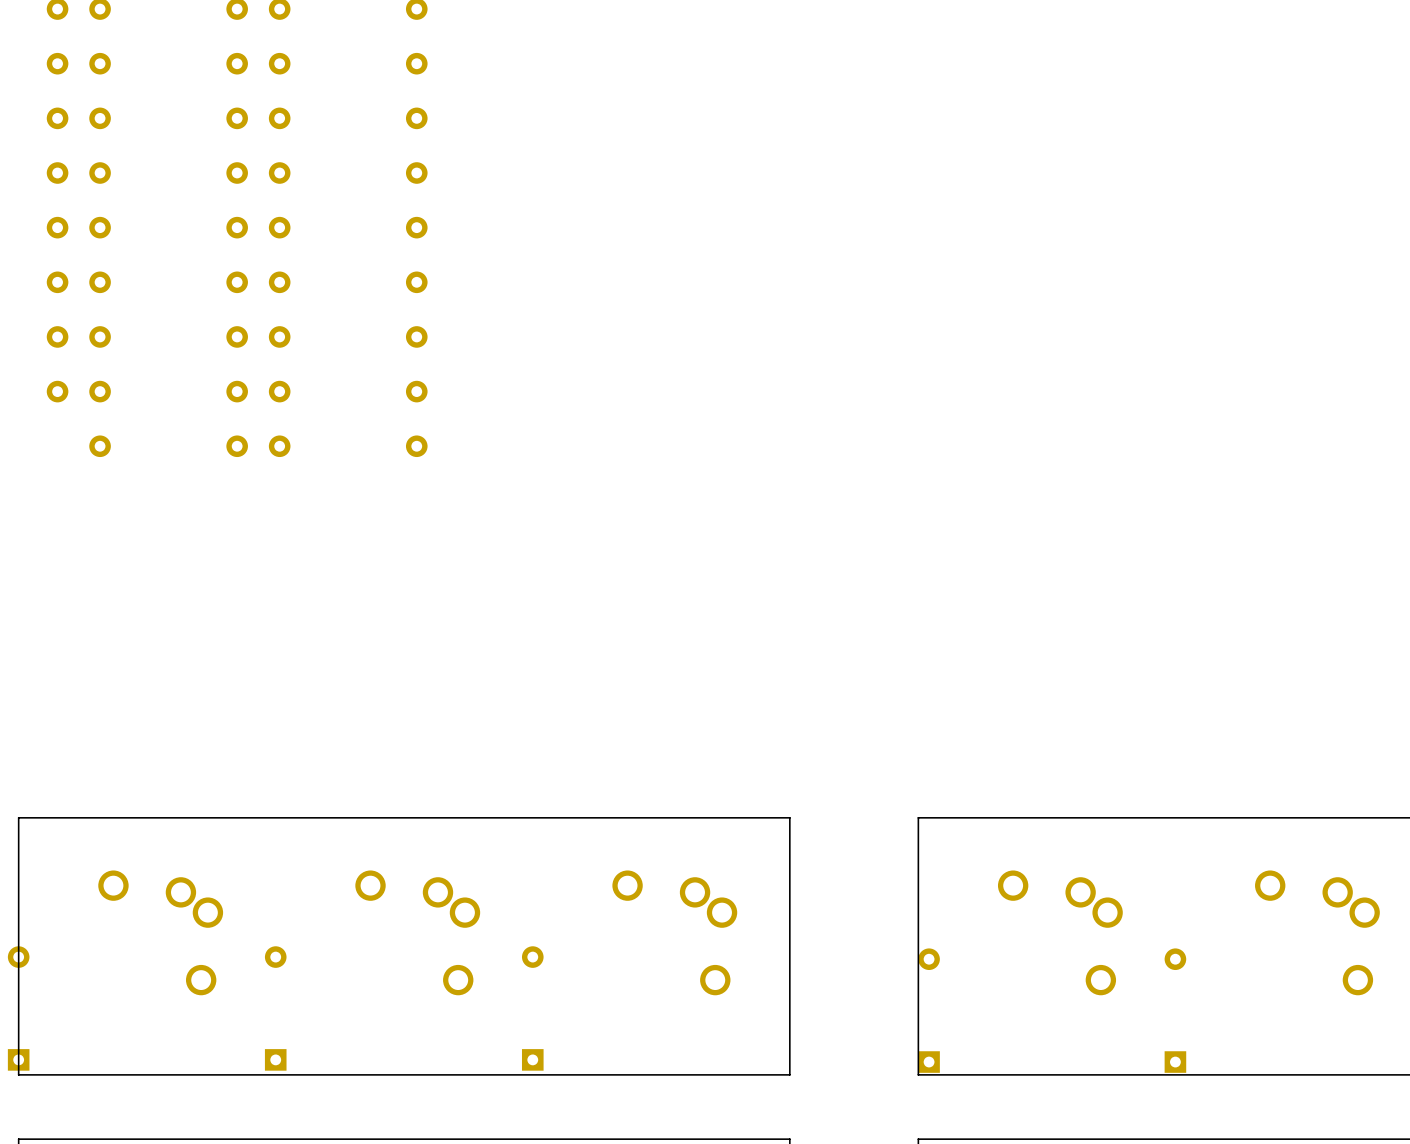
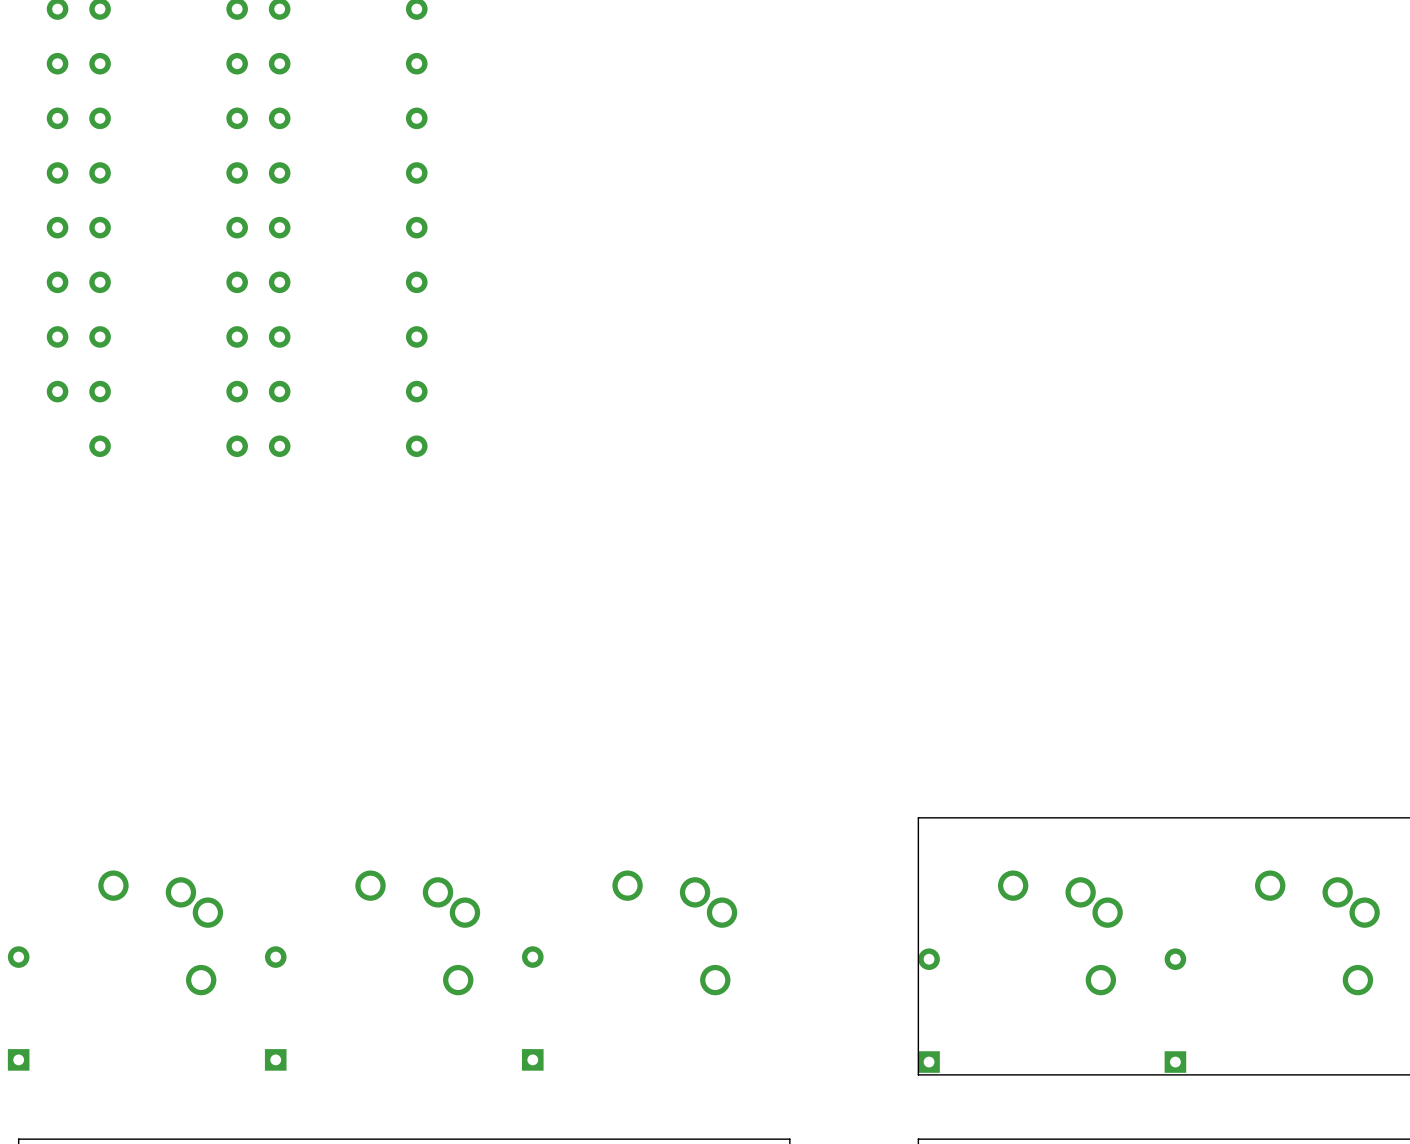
board edge: (789, 817) (18, 817) (18, 1074) (789, 1074) (789, 817) -> none

